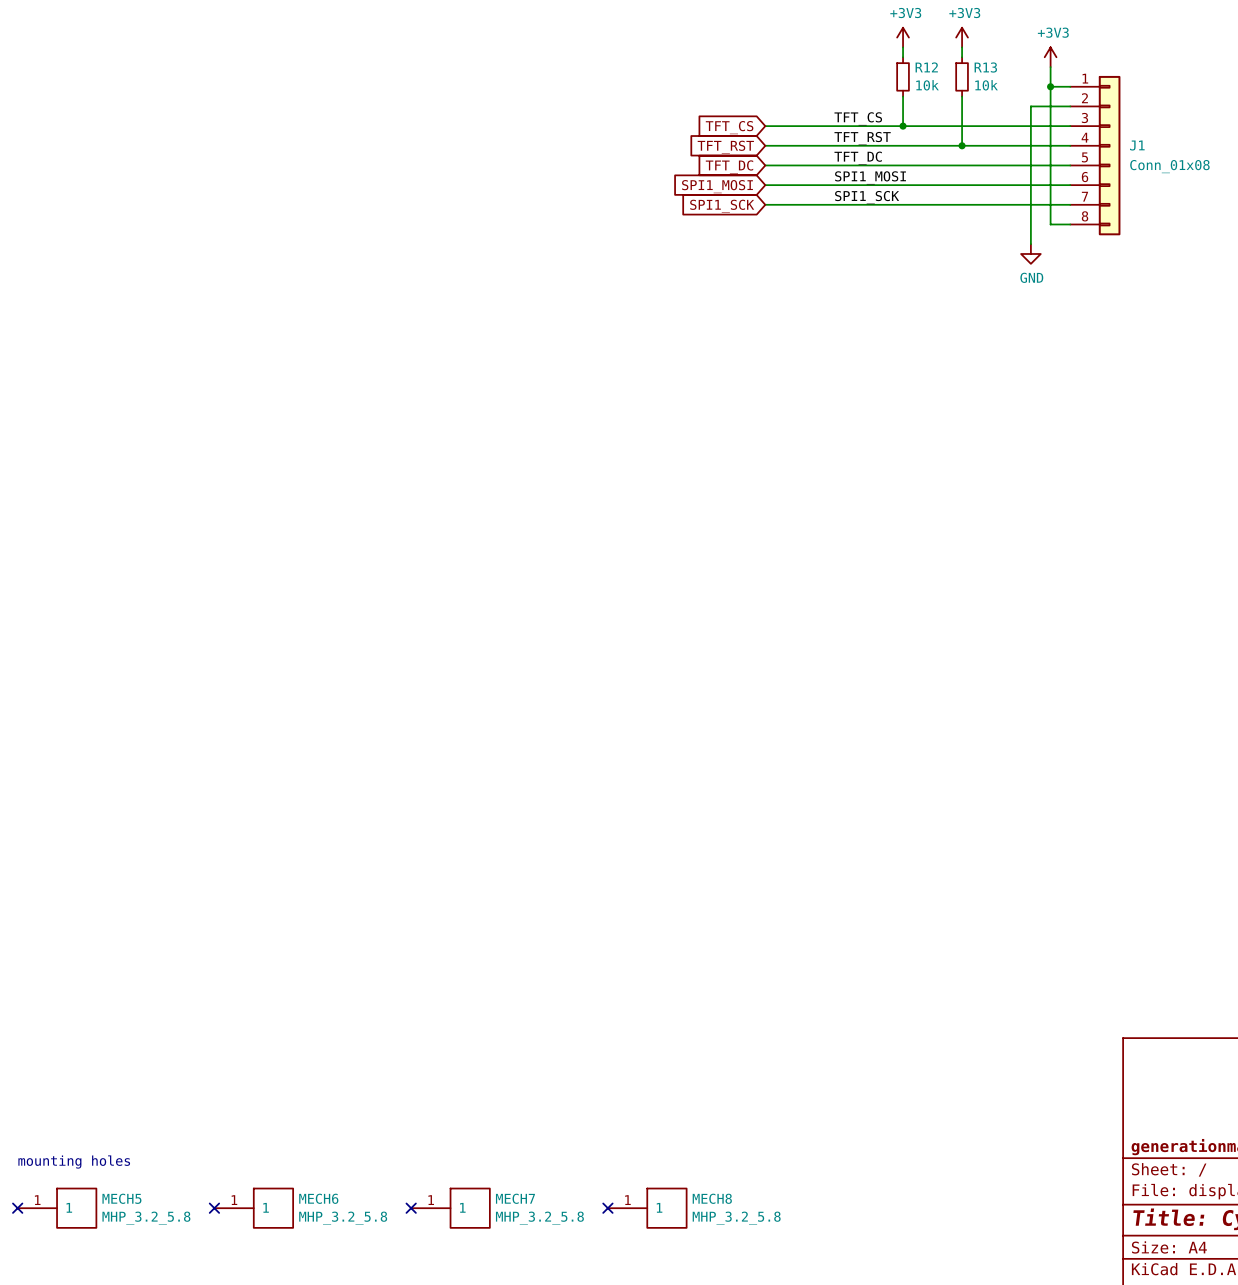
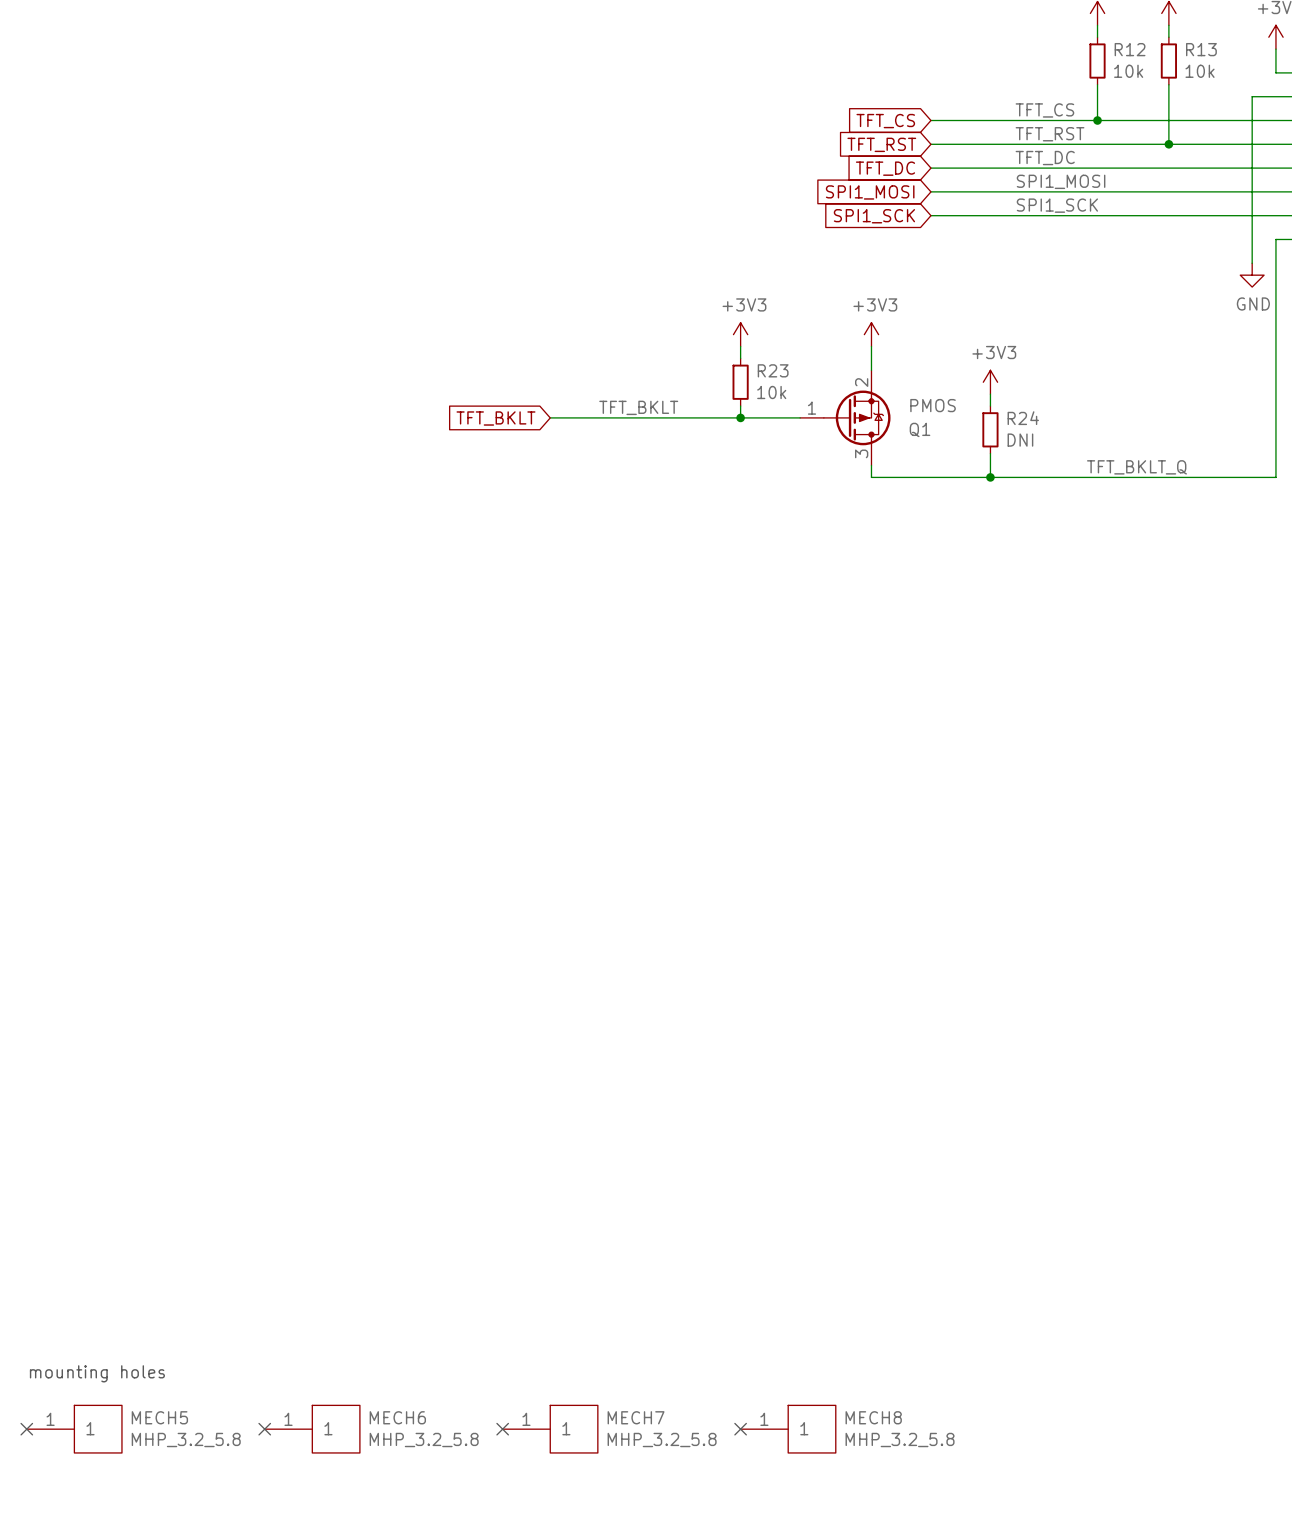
wire: (1050, 86) (1050, 224) -> (871, 465) (871, 477) (1275, 477) (1275, 239)
junction: (1050, 86) -> none
power symbol: none -> +3V3 (740, 334)
power symbol: none -> +3V3 (871, 334)
wire: none -> (740, 346) (740, 358)
wire: none -> (871, 346) (871, 370)
R23: none -> 10k (740, 382)
power symbol: none -> +3V3 (990, 382)
wire: none -> (990, 394) (990, 406)
wire: none -> (740, 406) (740, 417)
label: none -> TFT_BKLT (638, 407)
wire: none -> (550, 417) (800, 417)
junction: none -> (740, 417)
Q1: none -> PMOS (845, 417)
global label: none -> TFT_BKLT (495, 418)
R24: none -> DNI (990, 429)
wire: none -> (990, 453) (990, 477)
label: none -> TFT_BKLT_Q (1136, 467)
junction: none -> (990, 477)

